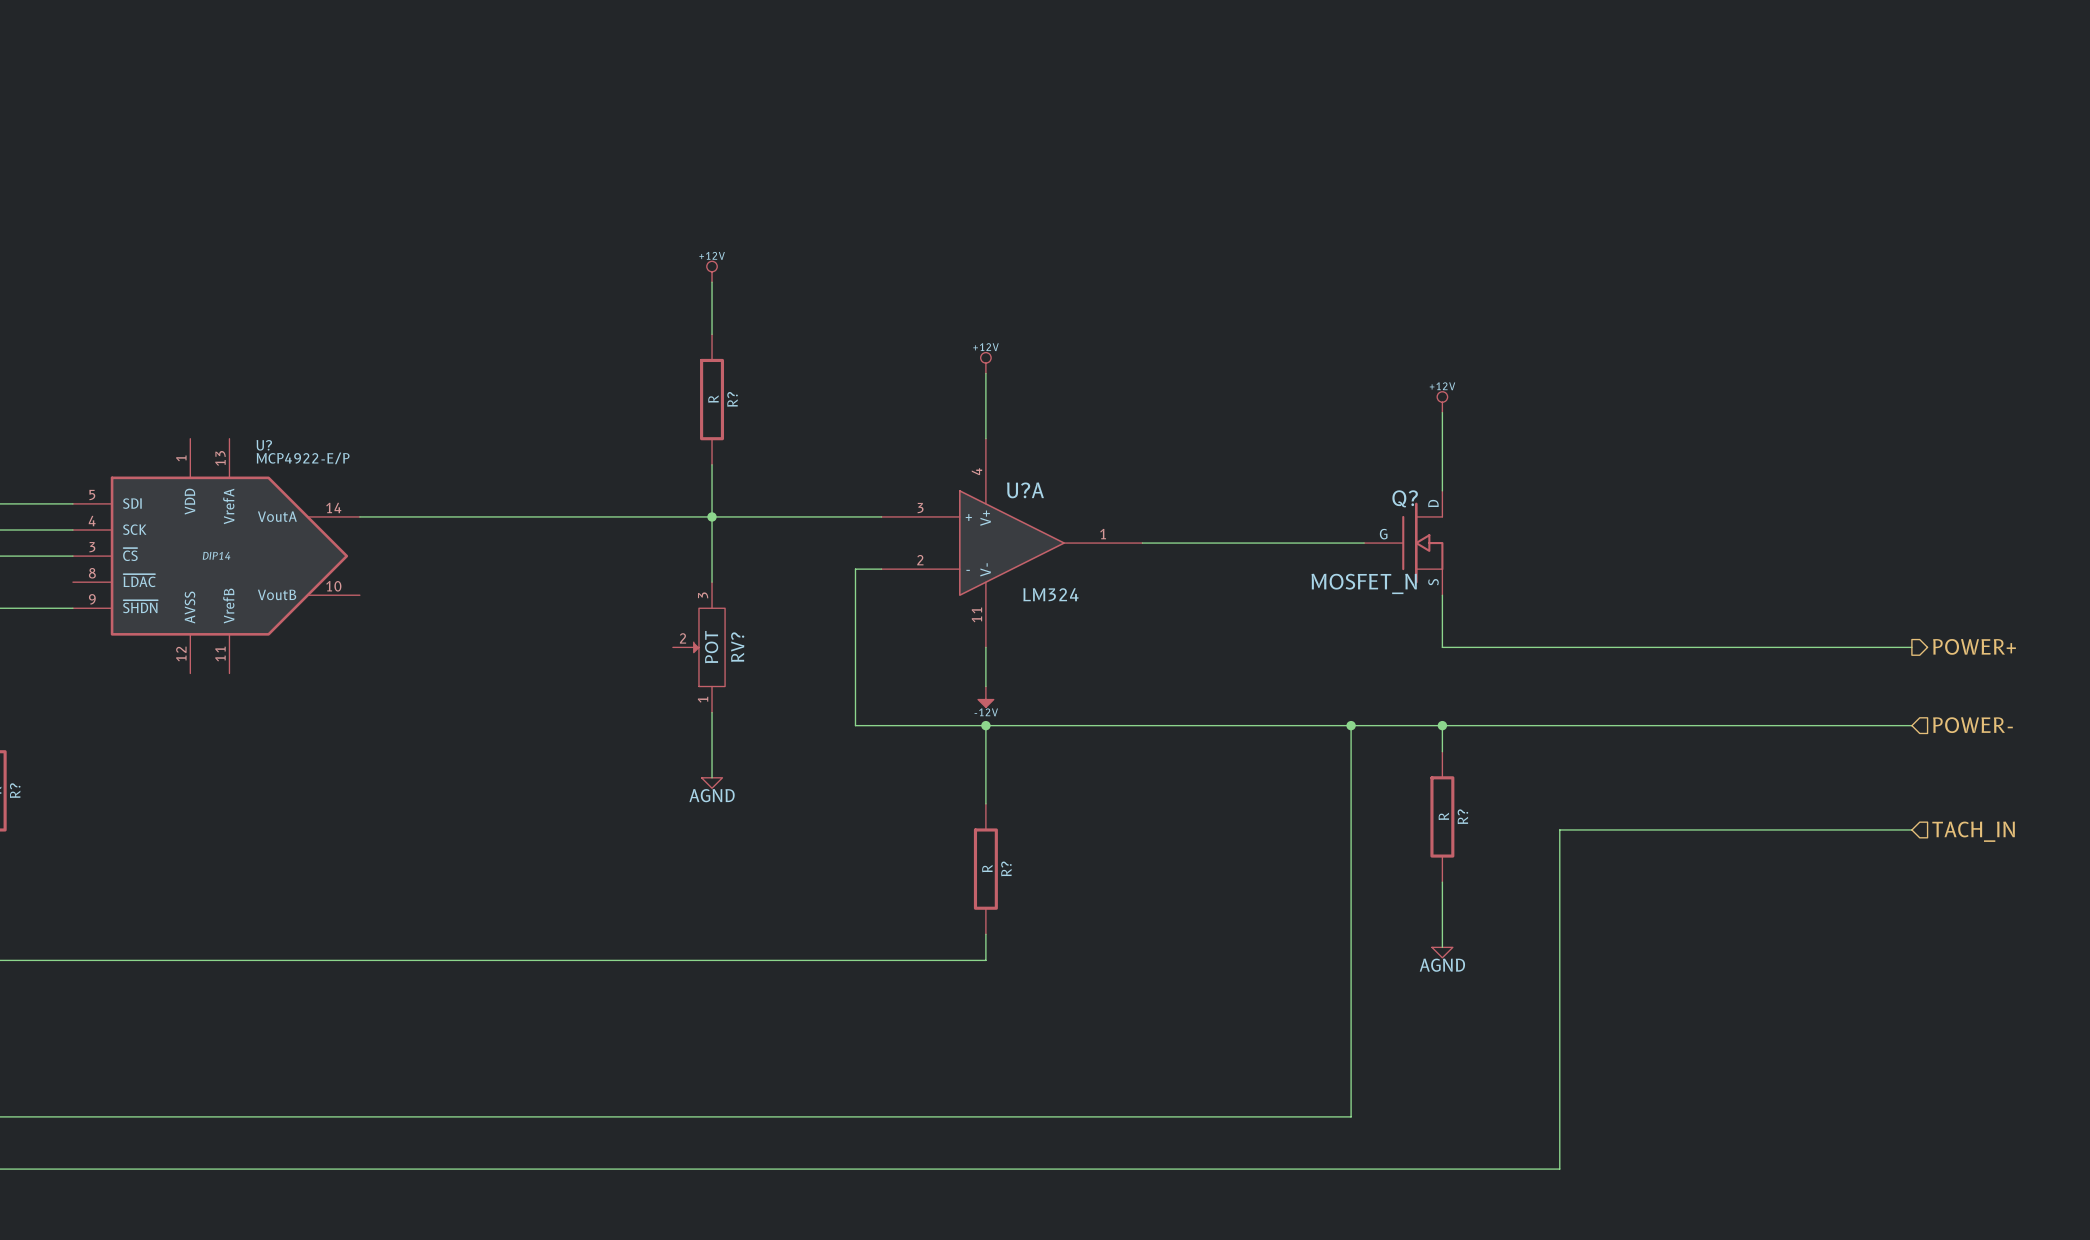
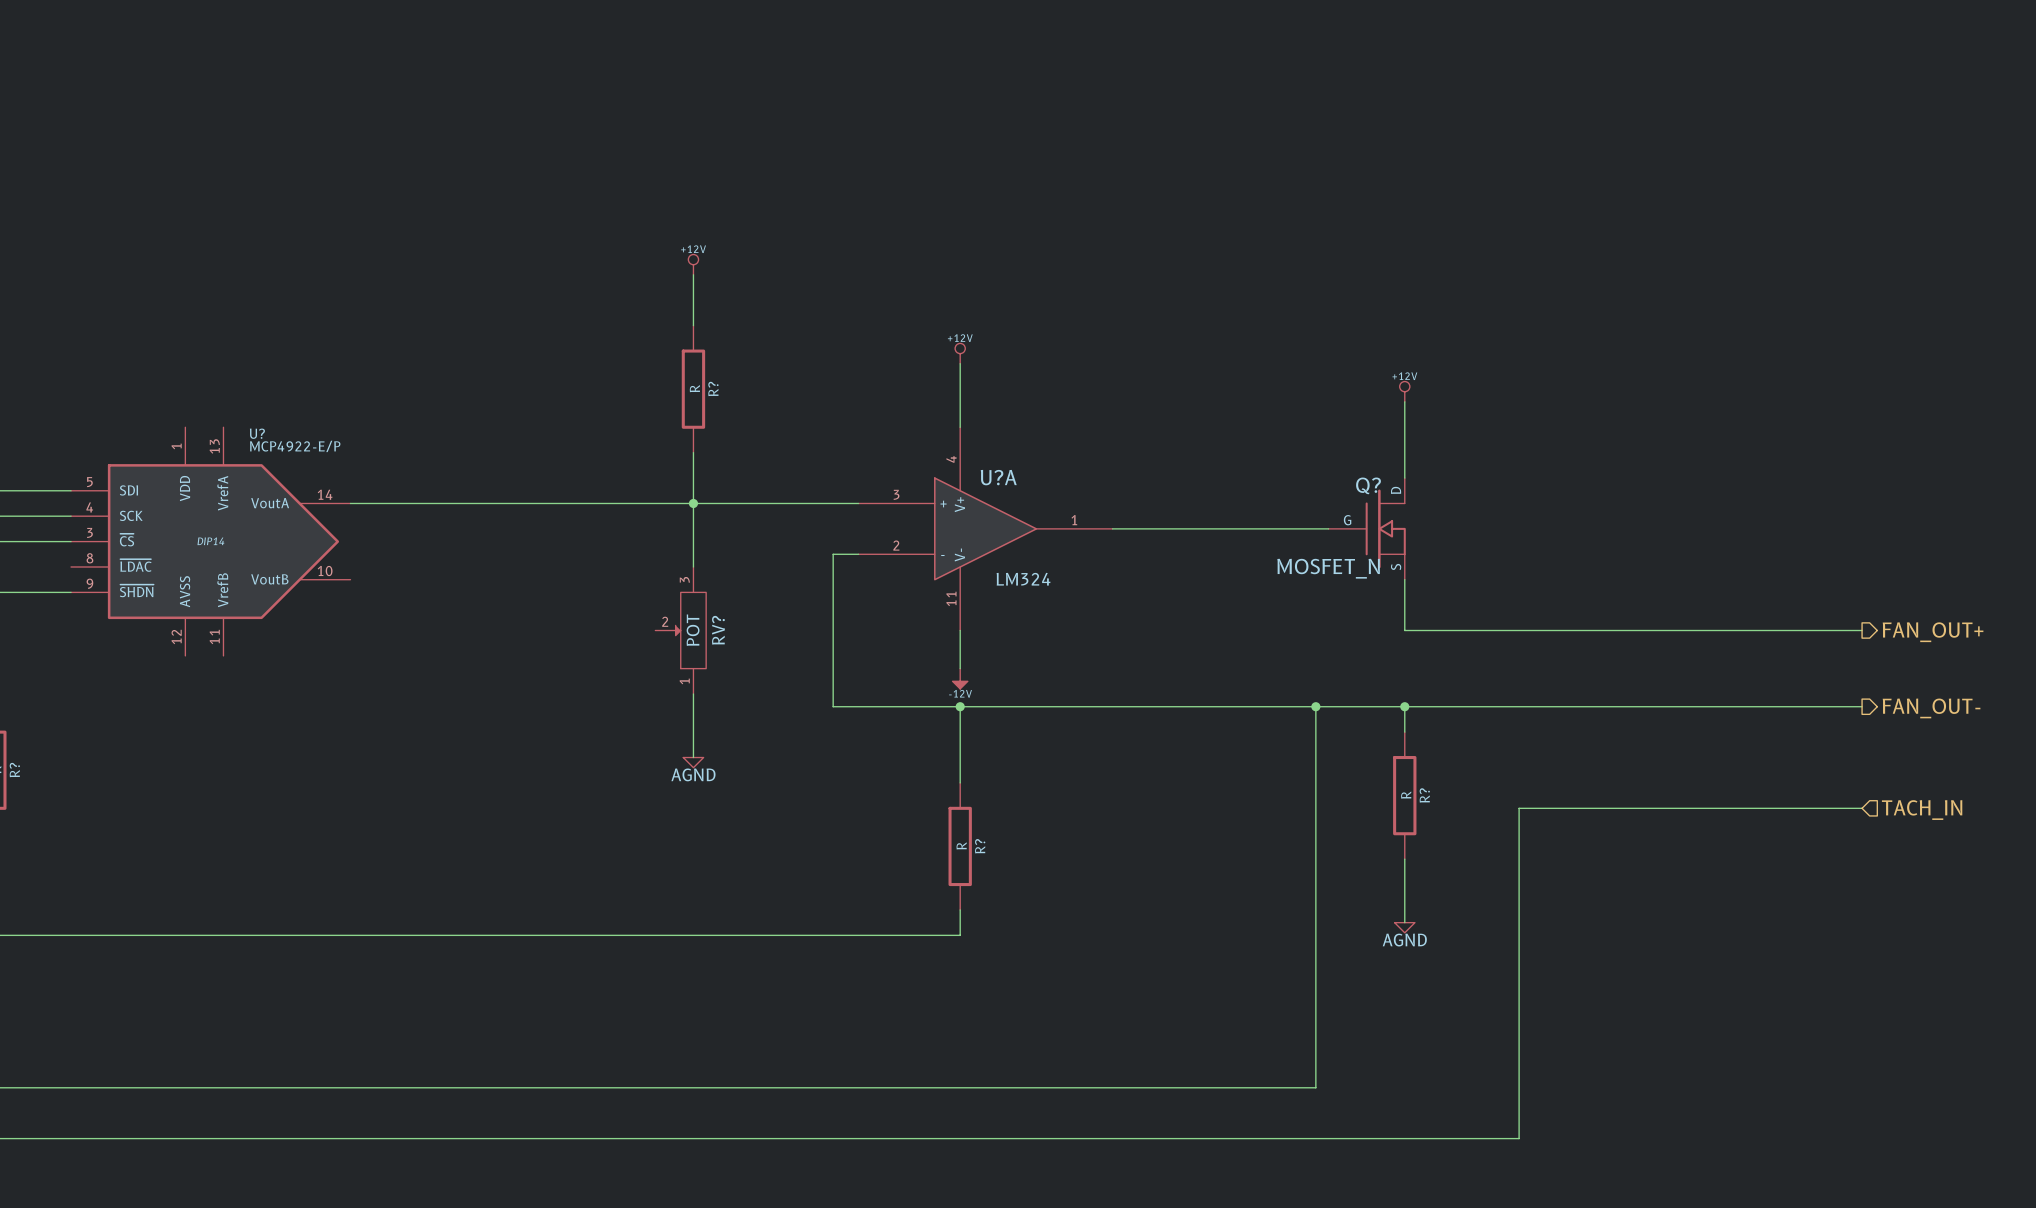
hierarchical label: POWER+ (1974, 646) -> FAN_OUT+ (1933, 632)
hierarchical label shape: input (1972, 725) -> output (1931, 708)
hierarchical label: POWER- (1972, 725) -> FAN_OUT- (1931, 708)

